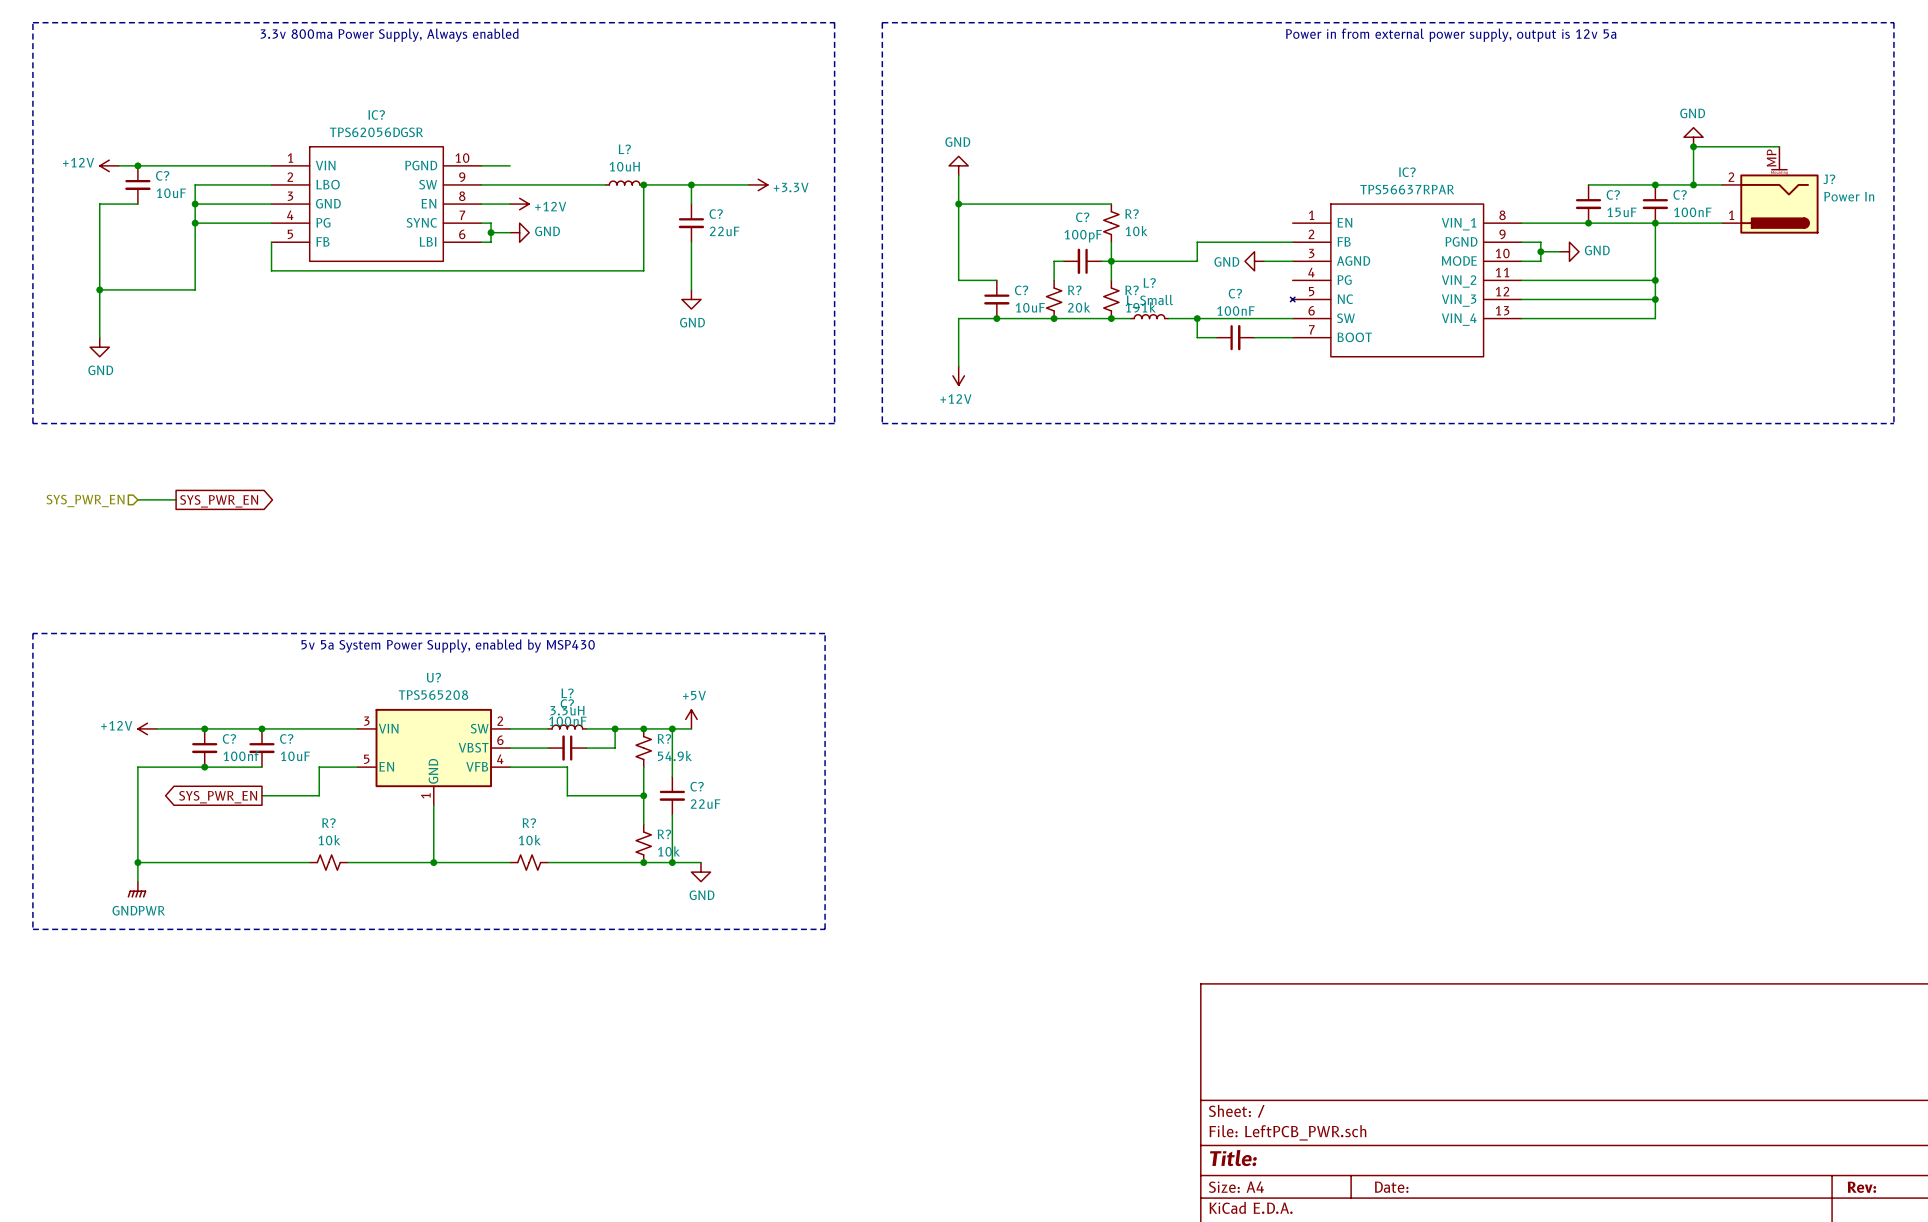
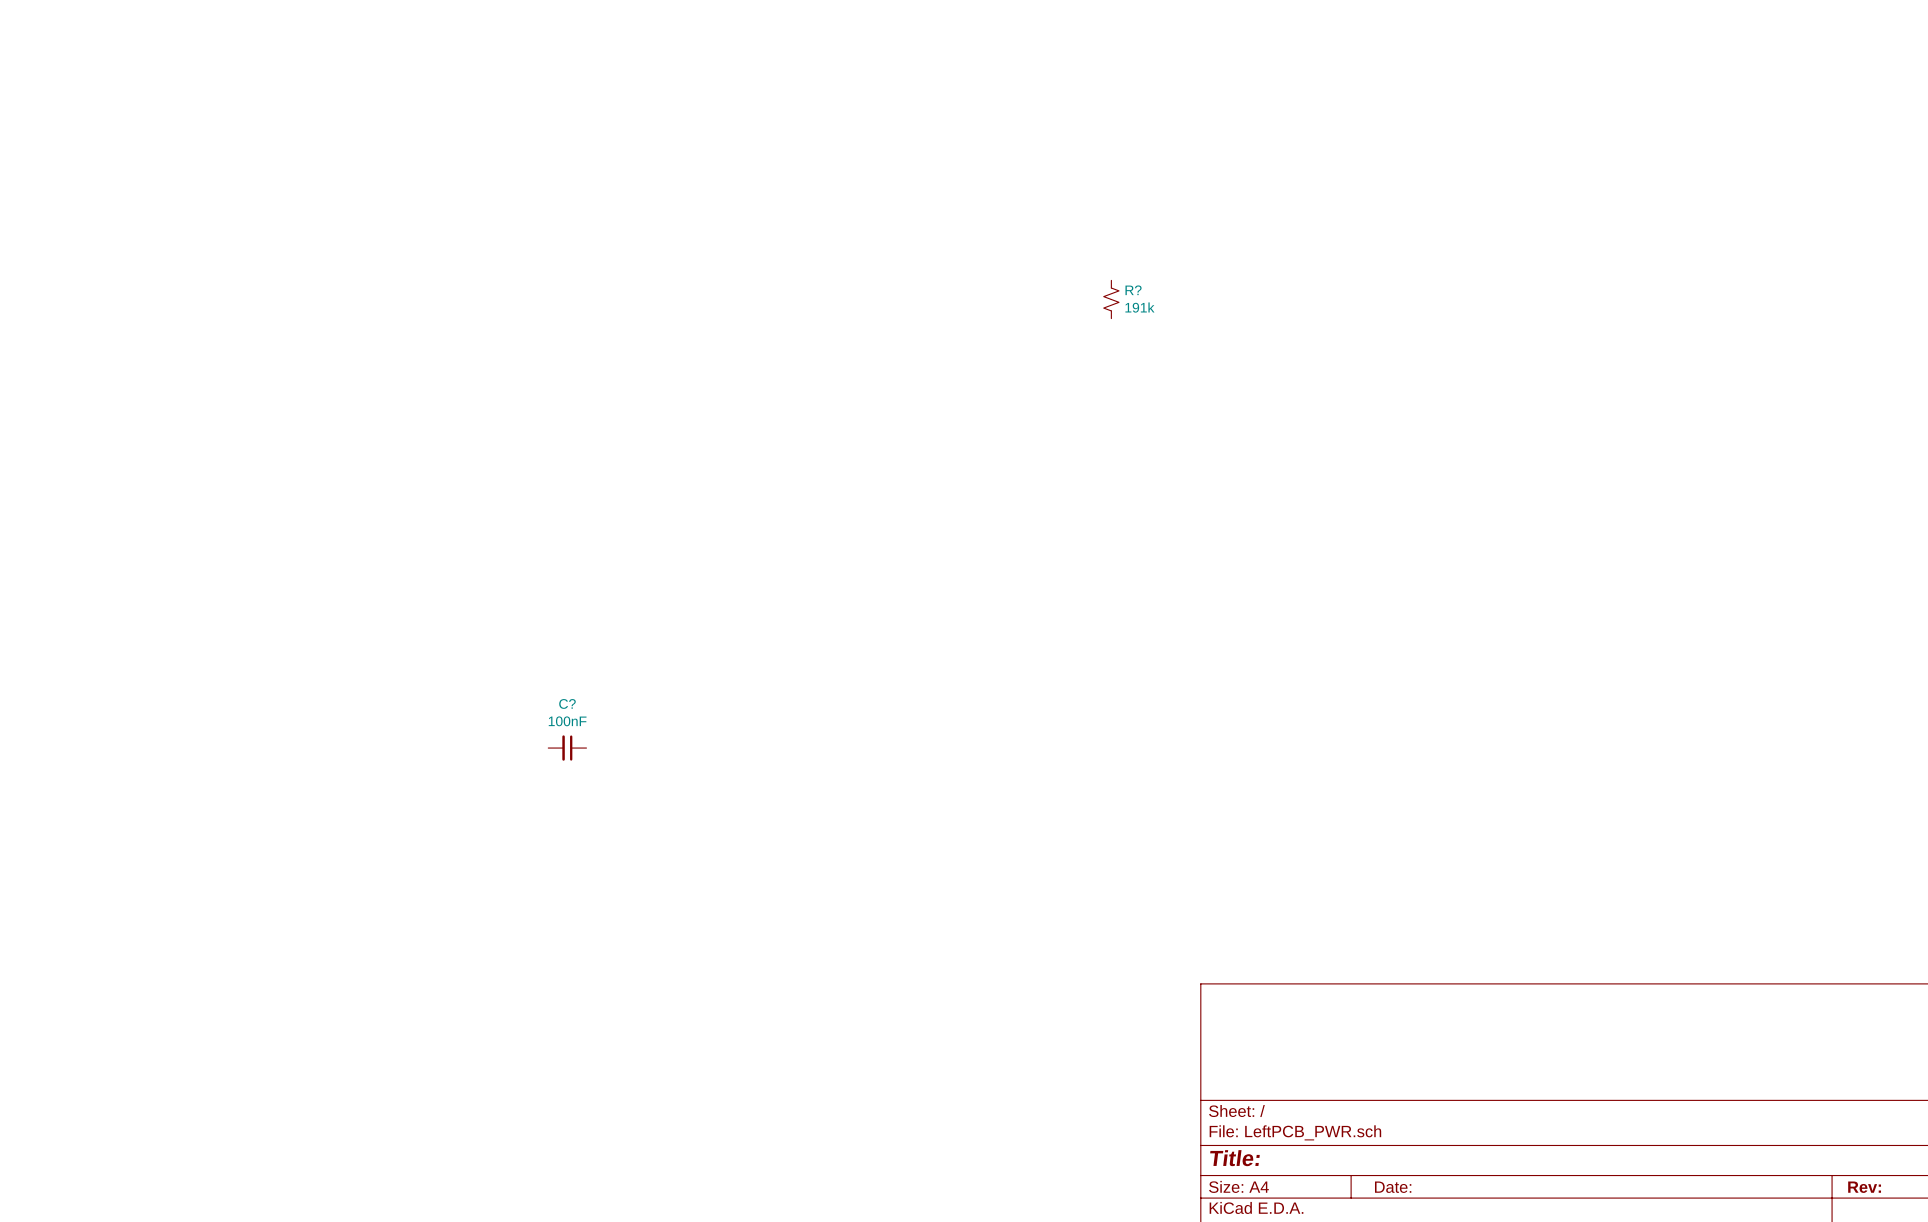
line: (32, 22) (834, 22) (834, 423) (32, 423) (32, 22) -> none
line: (882, 22) (882, 423) (1893, 423) (1893, 22) (882, 22) -> none
text: 3.3v 800ma Power Supply, Always enabled (389, 35) -> none
text: Power in from external power supply, output is 12v 5a (1451, 35) -> none
power symbol: GND (1693, 137) -> none
junction: (1693, 146) -> none
wire: (1779, 146) (1693, 146) (1693, 184) -> none
power symbol: +12V (109, 165) -> none
wire: (118, 165) (271, 165) -> none
junction: (137, 165) -> none
wire: (481, 165) (510, 165) -> none
power symbol: GND (958, 165) -> none
wire: (958, 175) (958, 280) (996, 280) -> none
L?: 10uH (624, 183) -> none
C?: 10uF (137, 184) -> none
wire: (271, 184) (195, 184) (195, 289) (99, 289) -> none
wire: (481, 184) (605, 184) -> none
junction: (643, 184) -> none
wire: (691, 184) (691, 204) -> none
junction: (691, 184) -> none
wire: (748, 184) (643, 184) (643, 270) (271, 270) (271, 242) -> none
power symbol: +3.3V (758, 184) -> none
wire: (1588, 184) (1722, 184) -> none
junction: (1655, 184) -> none
junction: (1693, 184) -> none
J?: Power In (1770, 190) -> none
wire: (137, 204) (99, 204) (99, 337) -> none
wire: (195, 204) (271, 204) -> none
junction: (195, 204) -> none
IC?: TPS62056DGSR (376, 204) -> none
wire: (481, 204) (510, 204) -> none
power symbol: +12V (519, 204) -> none
wire: (958, 204) (1111, 204) -> none
junction: (958, 204) -> none
C?: 15uF (1588, 204) -> none
C?: 100nF (1655, 204) -> none
wire: (195, 223) (271, 223) -> none
junction: (195, 223) -> none
wire: (481, 223) (491, 223) (491, 242) (481, 242) -> none
C?: 22uF (691, 223) -> none
R?: 10k (1111, 223) -> none
wire: (1521, 223) (1722, 223) -> none
junction: (1588, 223) -> none
wire: (1655, 223) (1655, 318) (1521, 318) -> none
junction: (1655, 223) -> none
wire: (491, 232) (510, 232) -> none
junction: (491, 232) -> none
power symbol: GND (519, 232) -> none
wire: (691, 242) (691, 289) -> none
wire: (1111, 242) (1111, 280) -> none
wire: (1292, 242) (1197, 242) (1197, 261) (1101, 261) -> none
wire: (1521, 242) (1540, 242) (1540, 261) (1521, 261) -> none
wire: (1540, 251) (1559, 251) -> none
junction: (1540, 251) -> none
power symbol: GND (1569, 251) -> none
wire: (1063, 261) (1054, 261) (1054, 280) -> none
C?: 100pF (1082, 261) -> none
junction: (1111, 261) -> none
power symbol: GND (1254, 261) -> none
wire: (1264, 261) (1292, 261) -> none
IC?: TPS56637RPAR (1406, 280) -> none
wire: (1521, 280) (1655, 280) -> none
junction: (1655, 280) -> none
junction: (99, 289) -> none
power symbol: GND (691, 299) -> none
C?: 10uF (996, 299) -> none
R?: 20k (1054, 299) -> none
wire: (1521, 299) (1655, 299) -> none
junction: (1655, 299) -> none
L?: L_Small (1149, 316) -> none
junction: (996, 318) -> none
junction: (1054, 318) -> none
junction: (1111, 318) -> none
wire: (1130, 318) (958, 318) (958, 366) -> none
wire: (1168, 318) (1292, 318) -> none
wire: (1197, 318) (1197, 337) (1216, 337) -> none
junction: (1197, 318) -> none
C?: 100nF (1235, 337) -> none
wire: (1254, 337) (1292, 337) -> none
power symbol: GND (99, 347) -> none
power symbol: +12V (958, 375) -> none
wire: (137, 499) (176, 499) -> none
hierarchical label: SYS_PWR_EN (85, 500) -> none
global label: SYS_PWR_EN (219, 501) -> none
line: (32, 633) (32, 929) (825, 929) (825, 633) (32, 633) -> none
text: 5v 5a System Power Supply, enabled by MSP430 (448, 646) -> none
power symbol: +5V (691, 719) -> none
L?: 3.3uH (567, 727) -> none
power symbol: +12V (147, 728) -> none
wire: (156, 728) (357, 728) -> none
junction: (204, 728) -> none
junction: (261, 728) -> none
wire: (510, 728) (548, 728) -> none
wire: (586, 728) (691, 728) -> none
wire: (615, 728) (615, 748) (586, 748) -> none
junction: (615, 728) -> none
junction: (643, 728) -> none
wire: (672, 728) (672, 776) -> none
junction: (672, 728) -> none
C?: 100nf (204, 748) -> none
C?: 10uF (261, 748) -> none
wire: (510, 748) (548, 748) -> none
R?: 54.9k (643, 748) -> none
U?: TPS565208 (433, 757) -> none
junction: (204, 767) -> none
wire: (261, 767) (137, 767) (137, 881) -> none
wire: (357, 767) (319, 767) (319, 795) (261, 795) -> none
wire: (510, 767) (567, 767) (567, 795) (643, 795) -> none
wire: (643, 767) (643, 824) -> none
junction: (643, 795) -> none
C?: 22uF (672, 795) -> none
global label: SYS_PWR_EN (218, 797) -> none
wire: (433, 805) (433, 862) -> none
wire: (672, 814) (672, 862) -> none
R?: 10k (643, 843) -> none
wire: (137, 862) (309, 862) -> none
junction: (137, 862) -> none
R?: 10k (328, 862) -> none
wire: (347, 862) (510, 862) -> none
junction: (433, 862) -> none
R?: 10k (529, 862) -> none
wire: (548, 862) (700, 862) -> none
junction: (643, 862) -> none
junction: (672, 862) -> none
power symbol: GND (700, 872) -> none
power symbol: GNDPWR (136, 889) -> none

